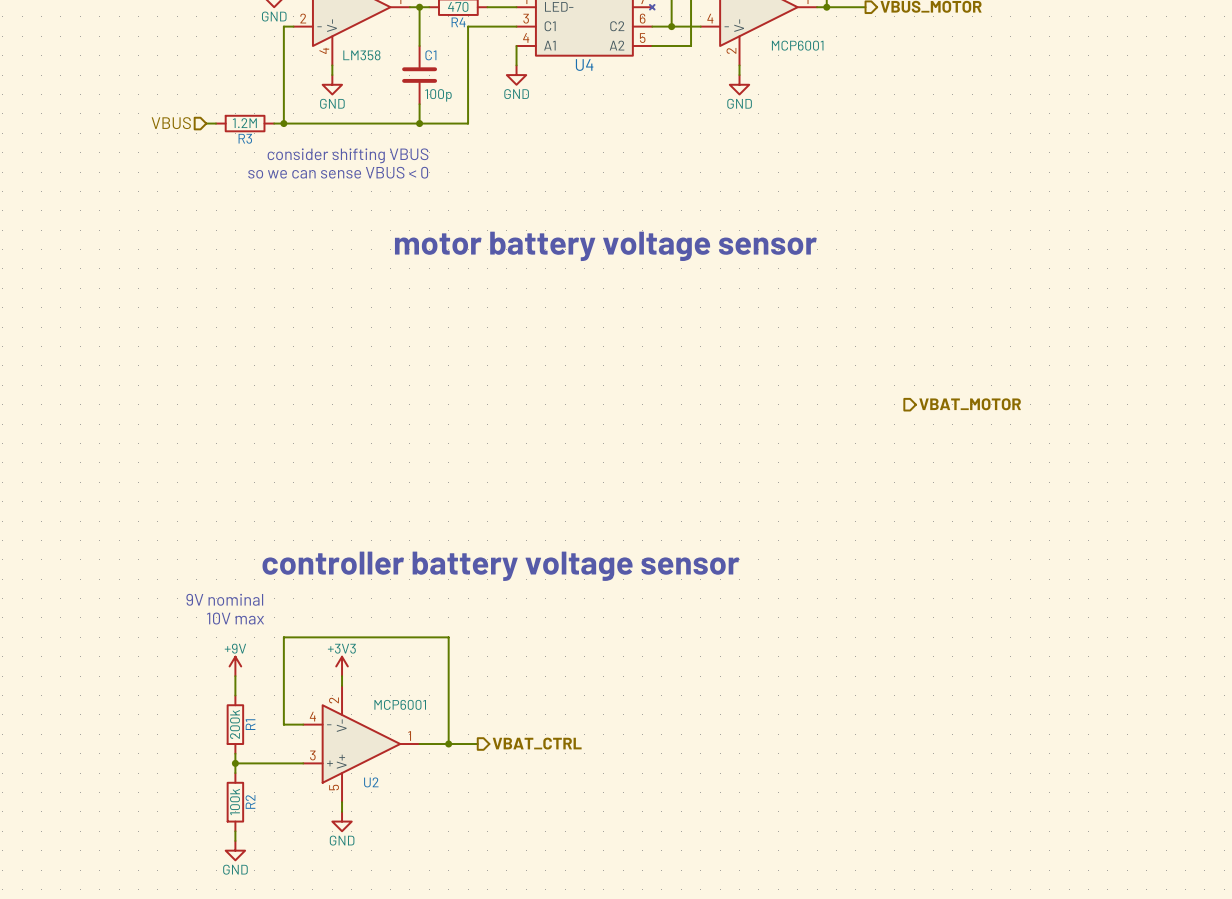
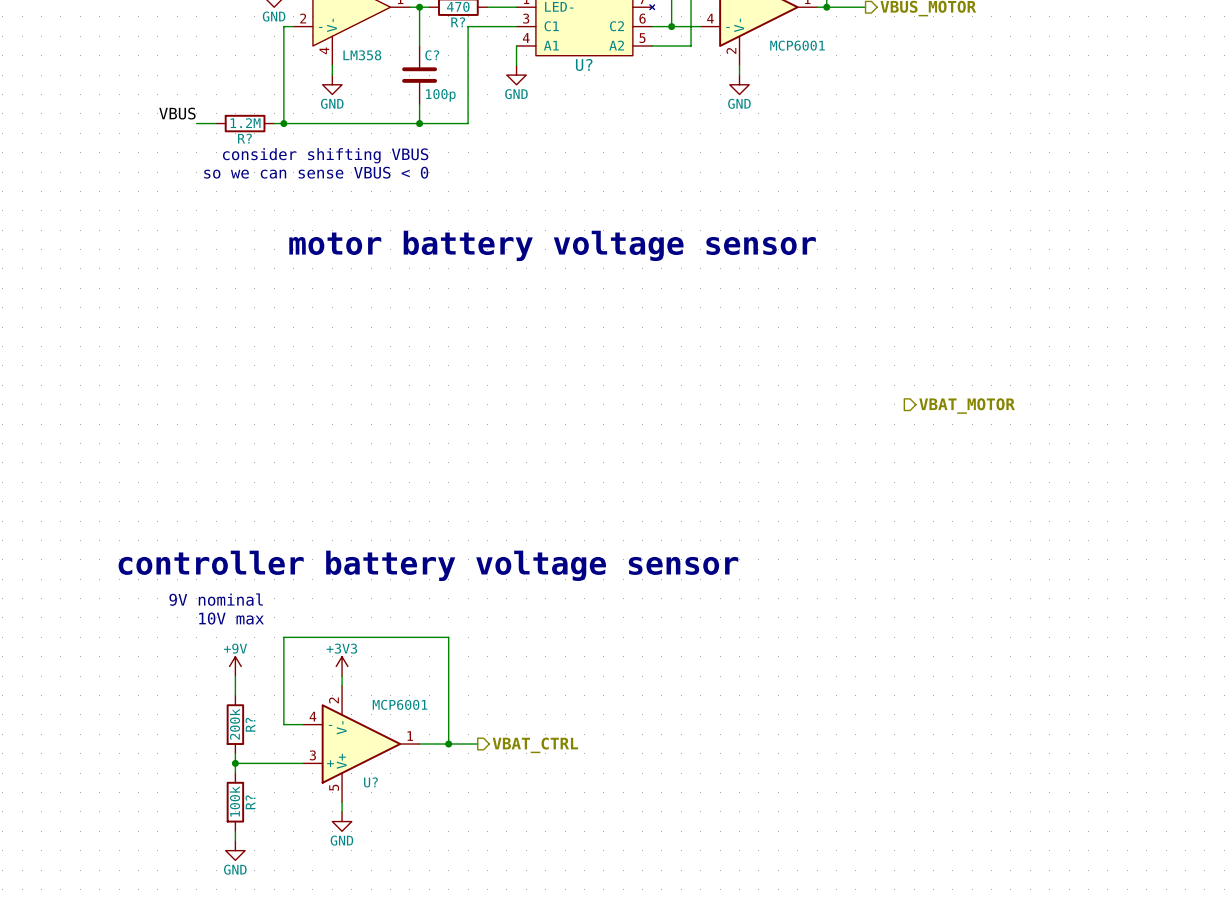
R4 name: R4 (458, 22) -> R? (458, 22)
C1 name: C1 (430, 55) -> C? (432, 55)
U4 name: U4 (584, 65) -> U? (584, 64)
label: none -> VBUS (177, 113)
hierarchical label: VBUS (171, 123) -> none
wire: none -> (196, 123) (206, 123)
R3 name: R3 (245, 138) -> R? (244, 138)
R1 name: R1 (250, 724) -> R? (250, 724)
U2 name: U2 (371, 782) -> U? (370, 782)
R2 name: R2 (250, 801) -> R? (250, 802)

